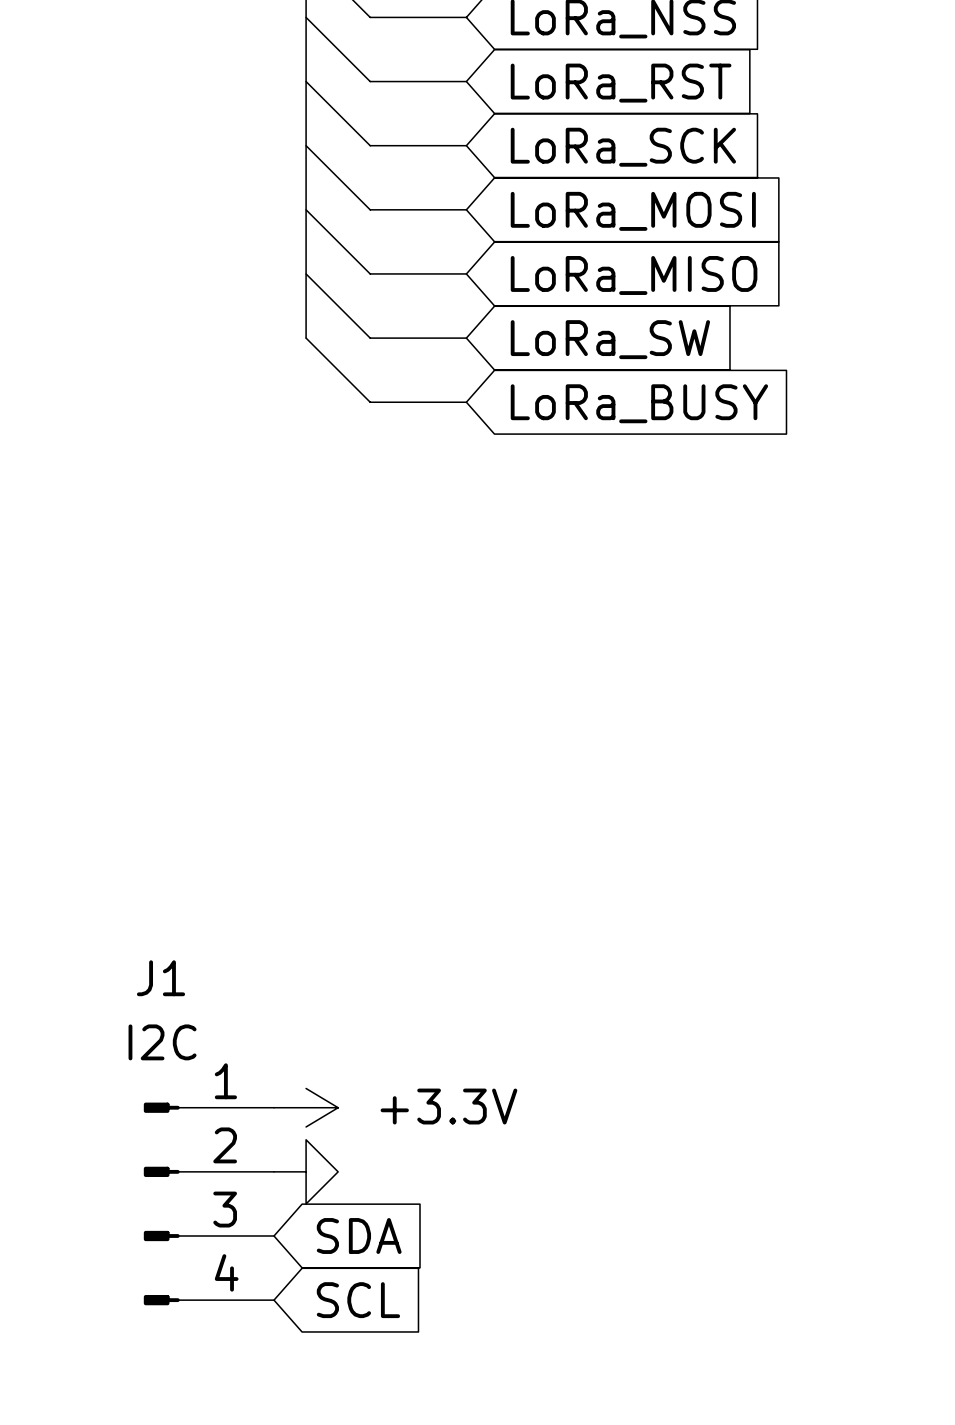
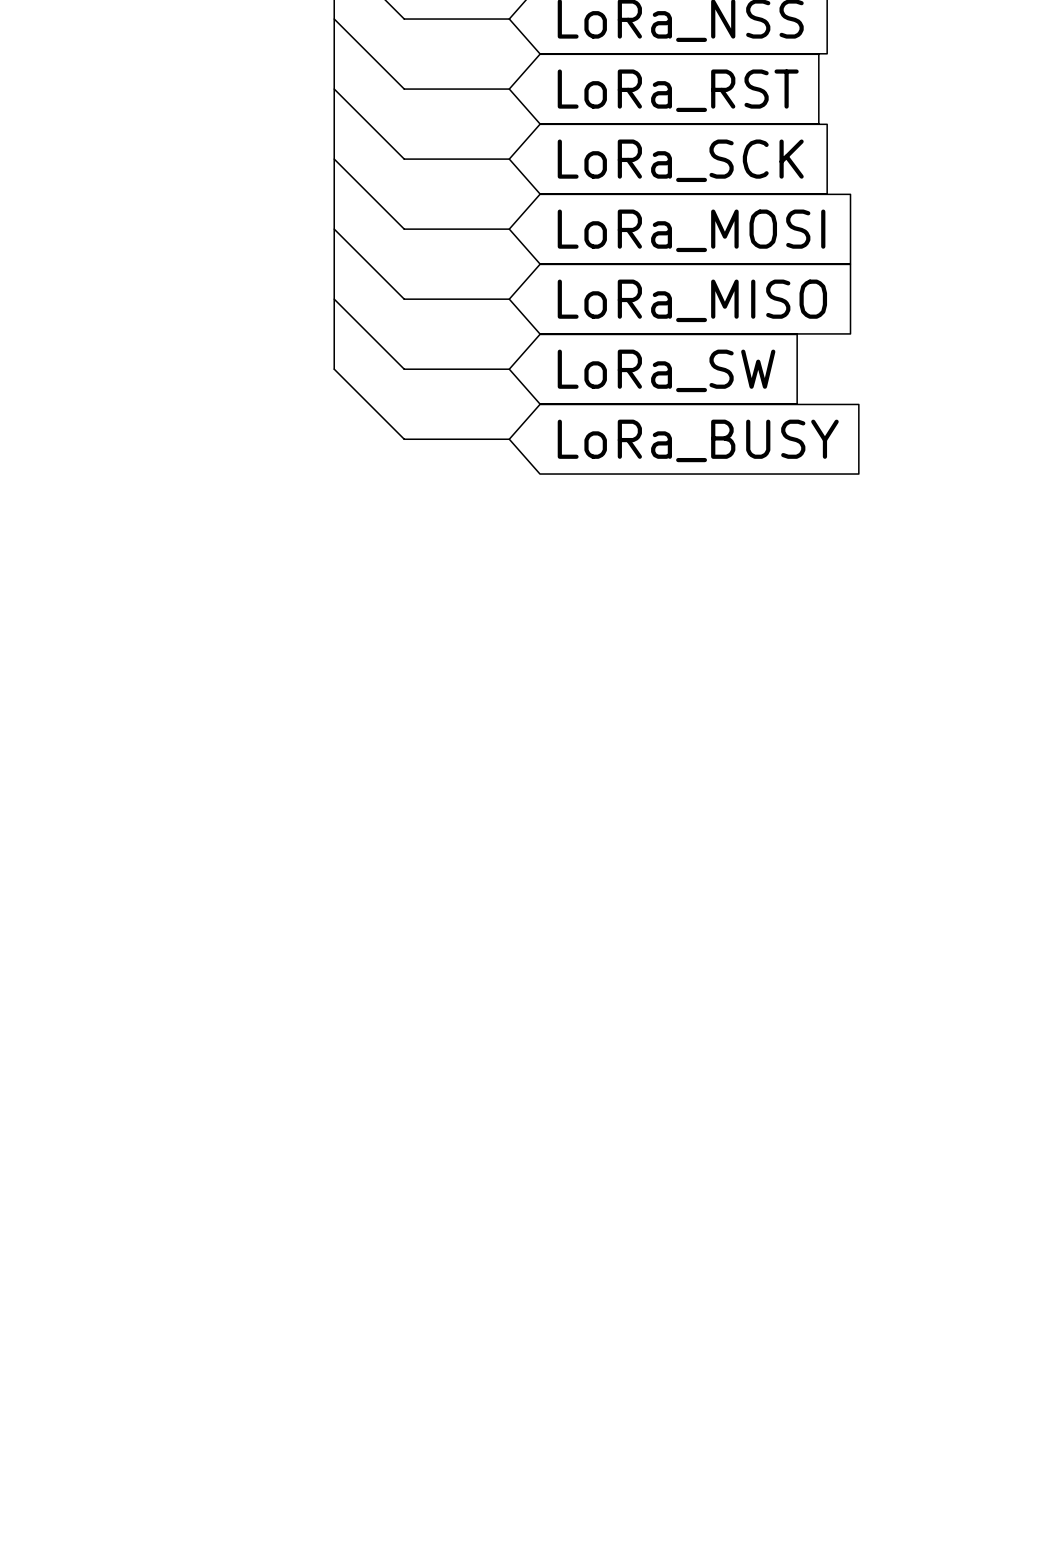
power symbol: +3.3V (306, 1107) -> none
power symbol: (306, 1171) -> none
J1: I2C (208, 1203) -> none
global label: SDA (359, 1236) -> none
global label: SCL (358, 1300) -> none

